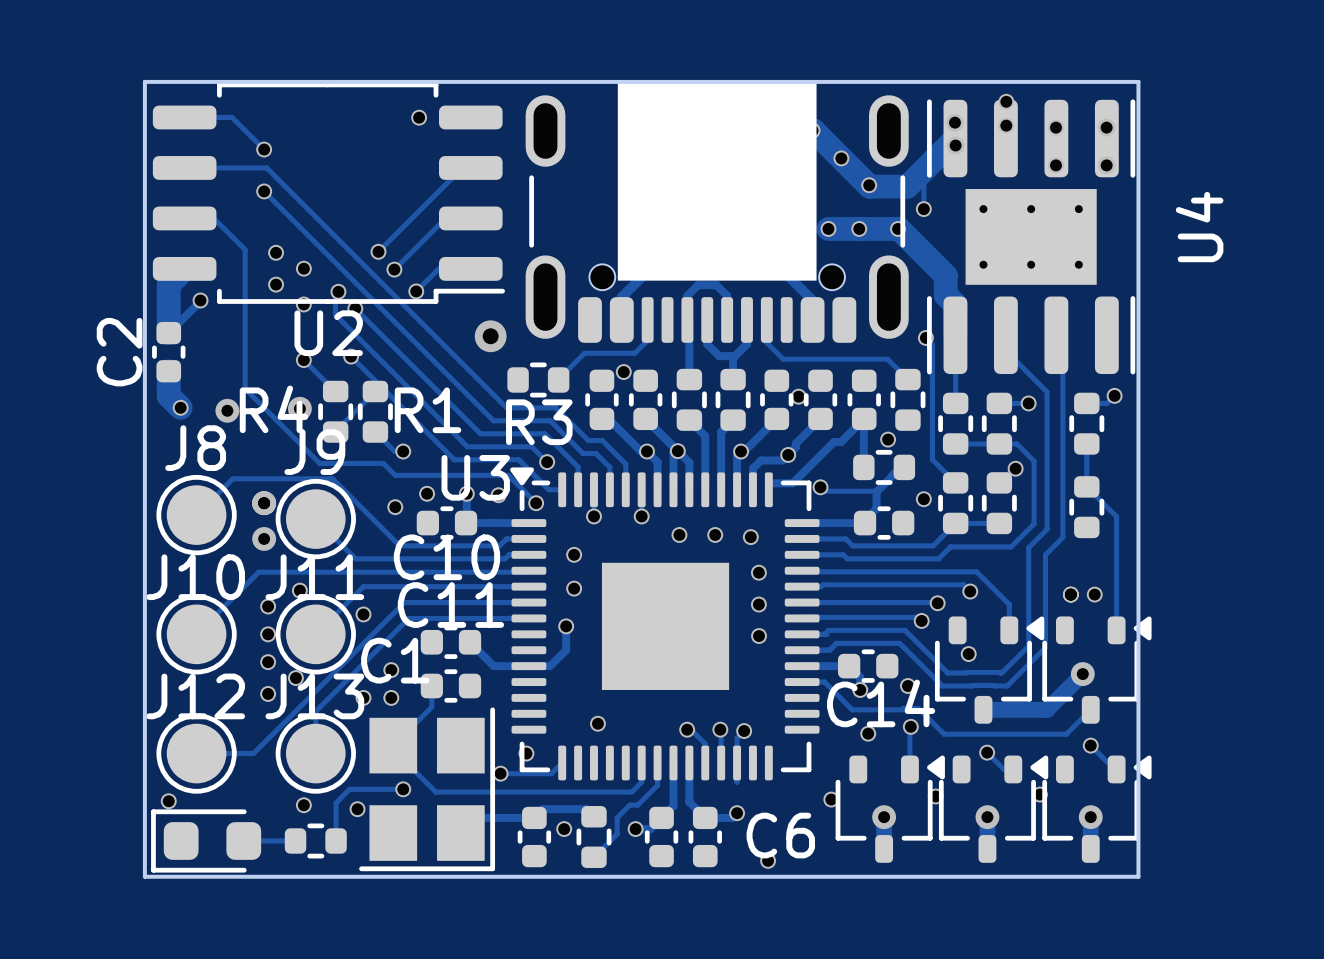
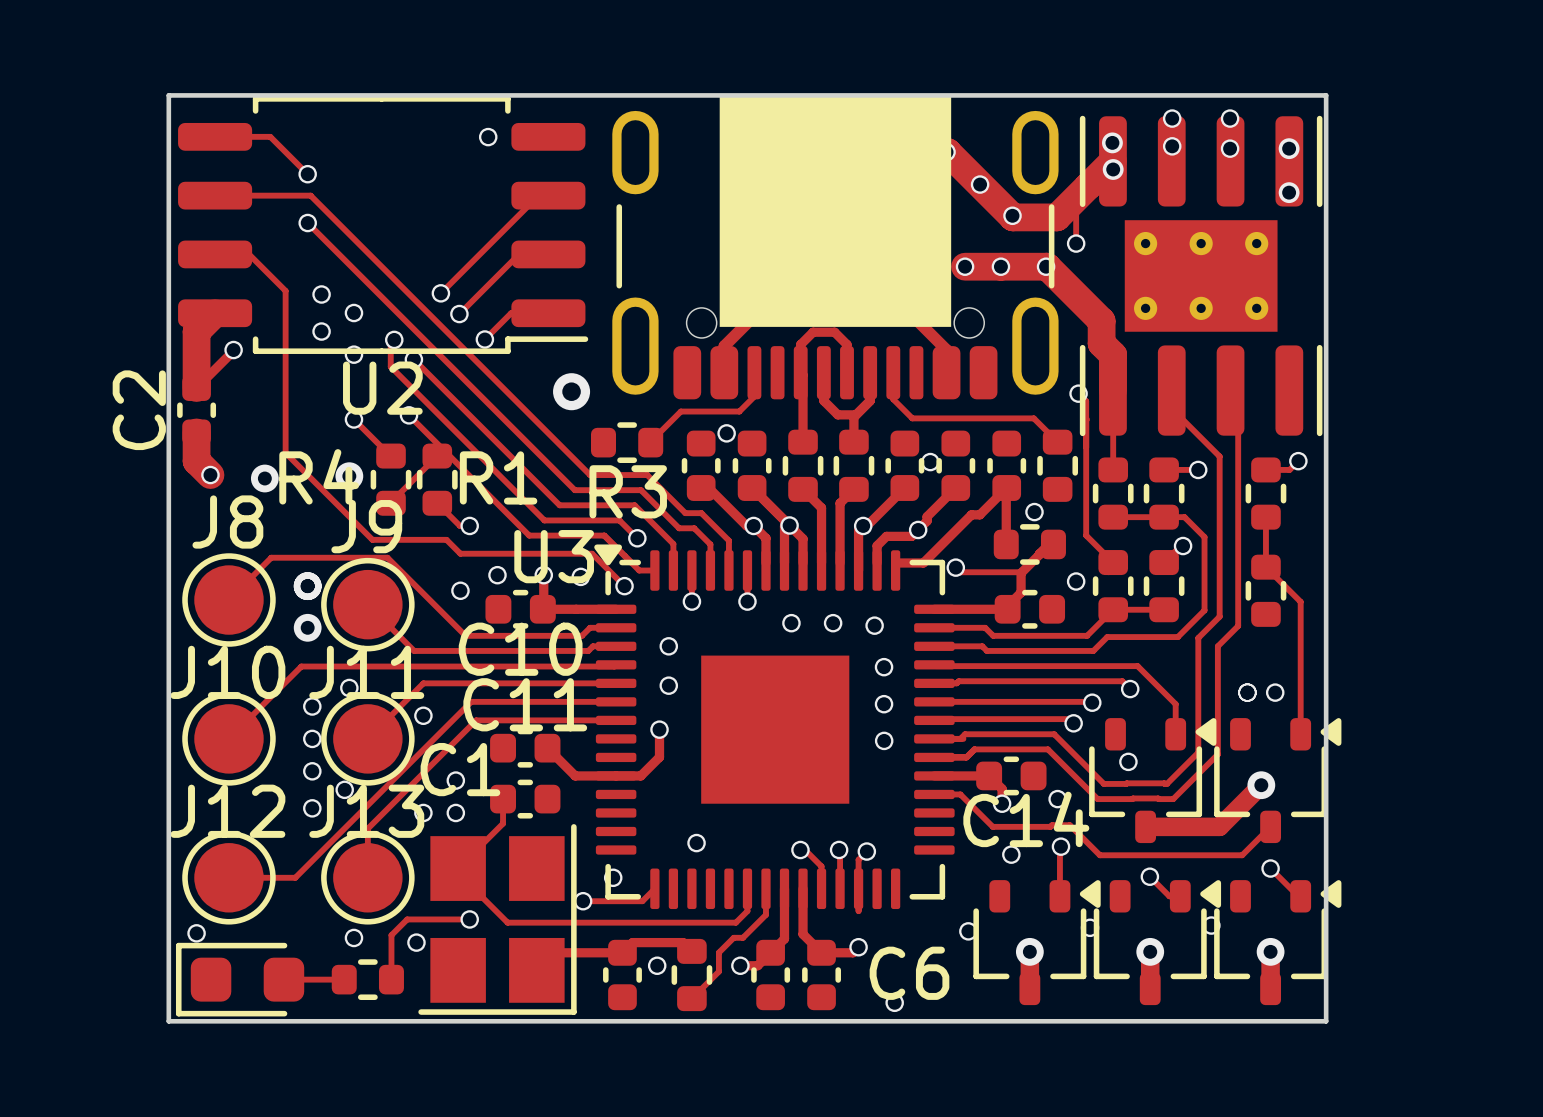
via position: (1055, 165) -> (1230, 118)
U4 name: U4 (1199, 227) -> none

